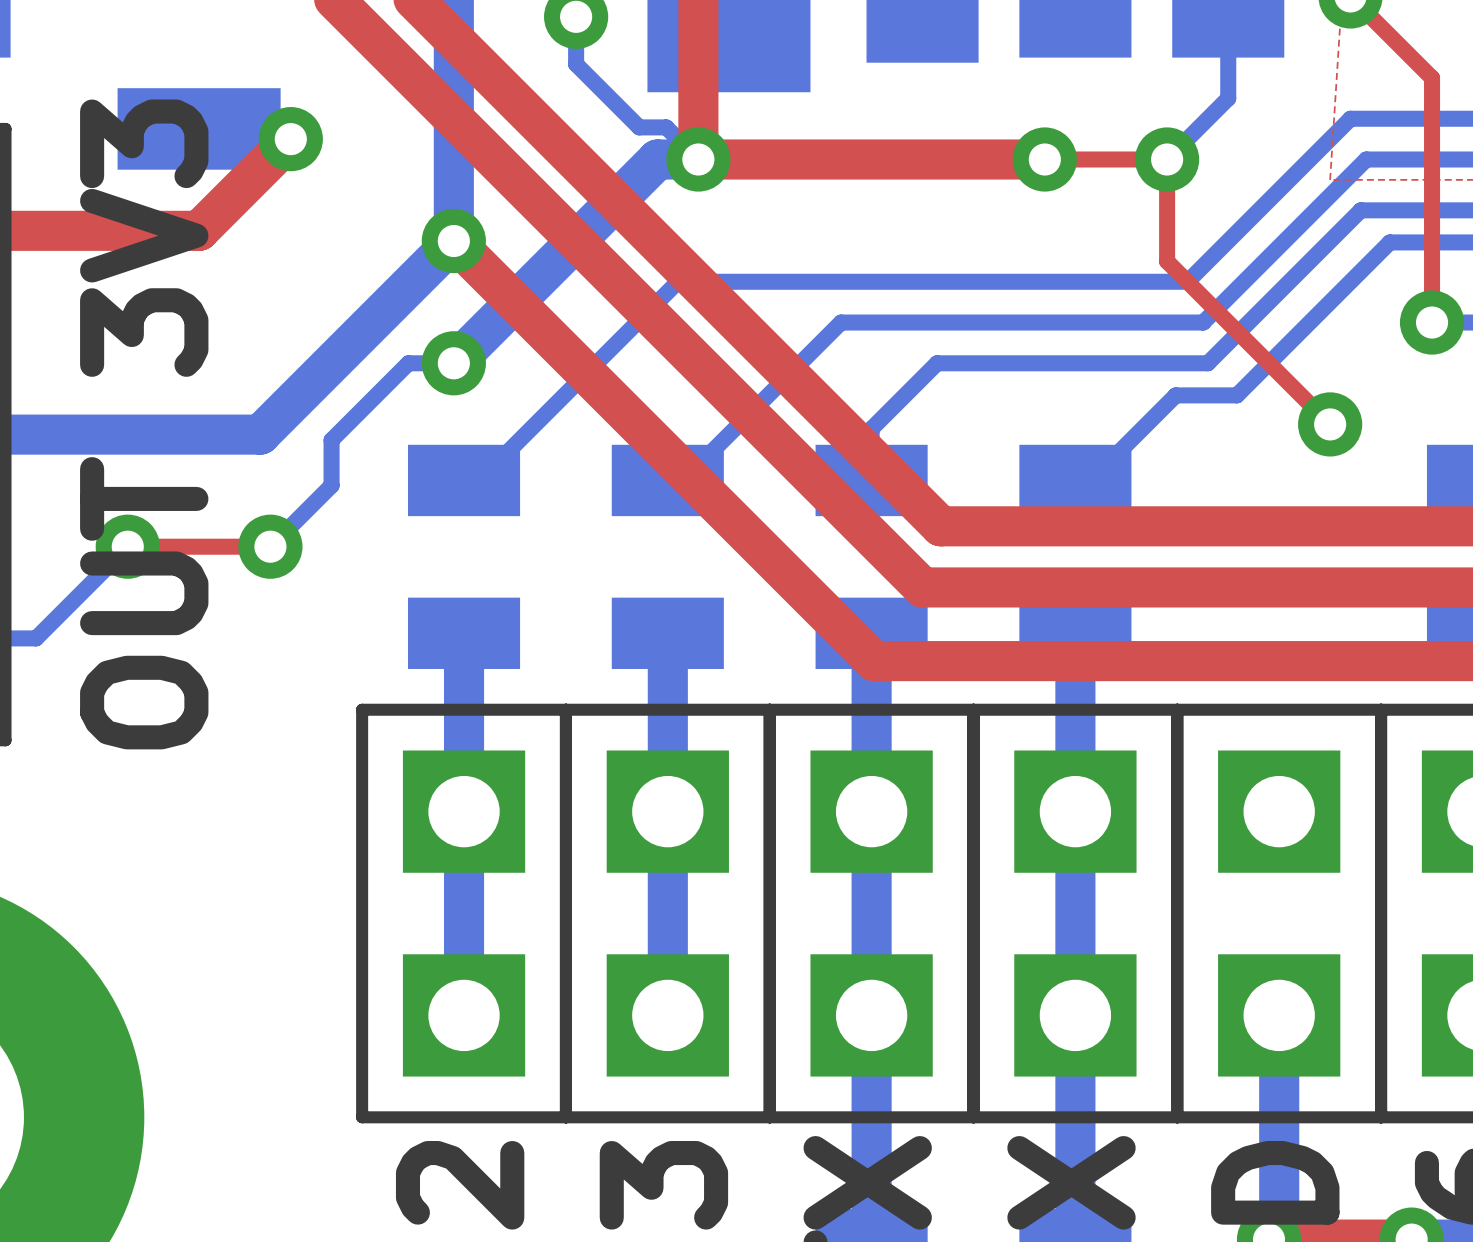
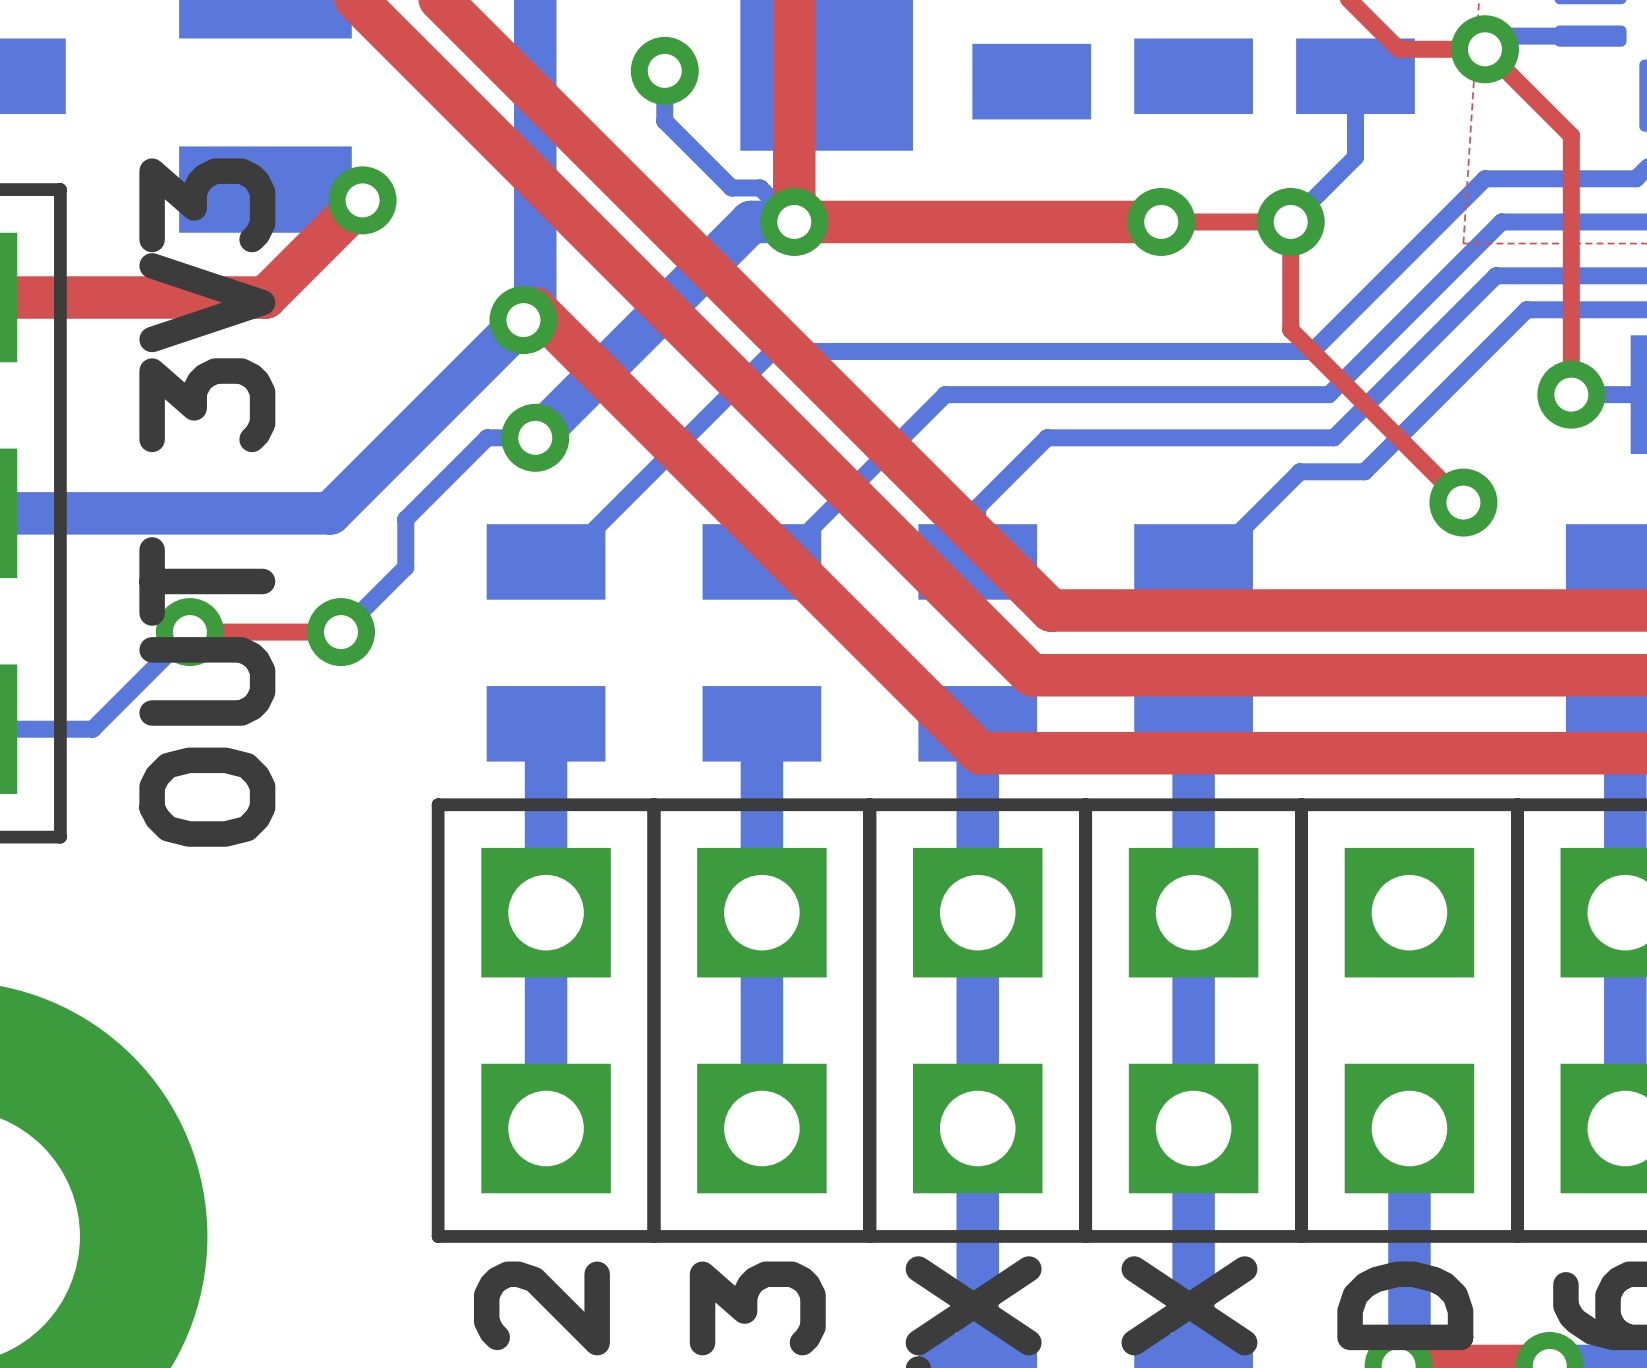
via position: (453, 241) -> (523, 320)

